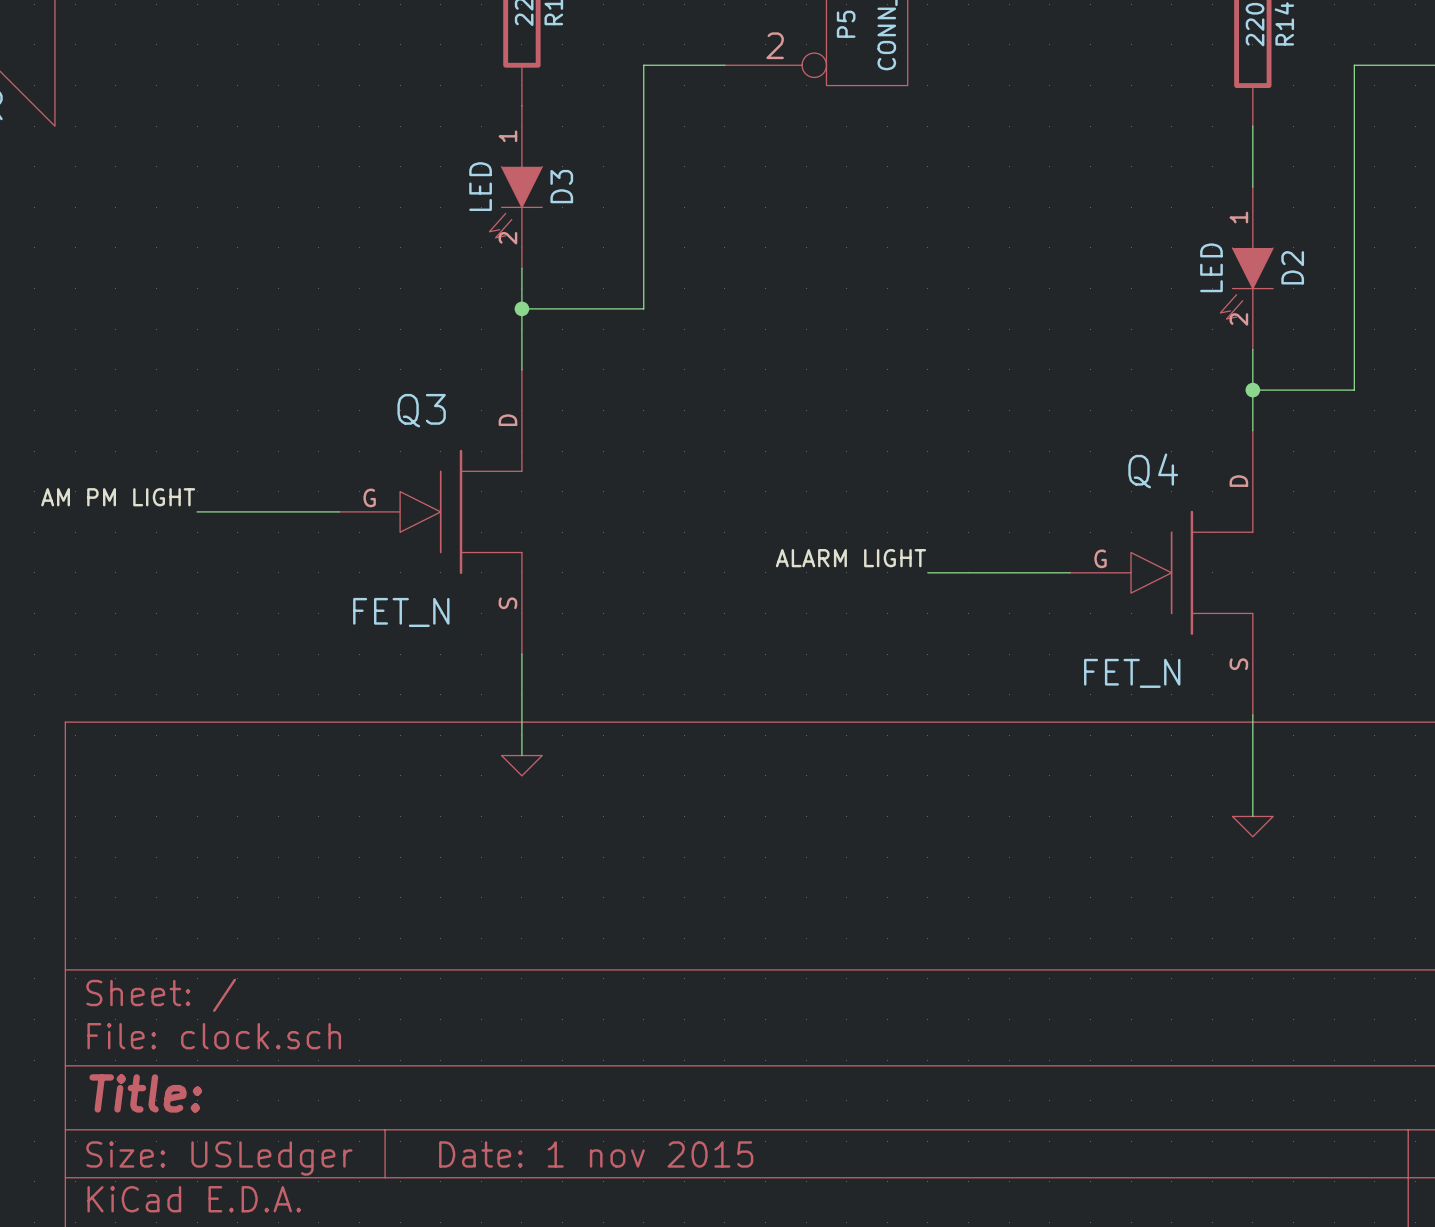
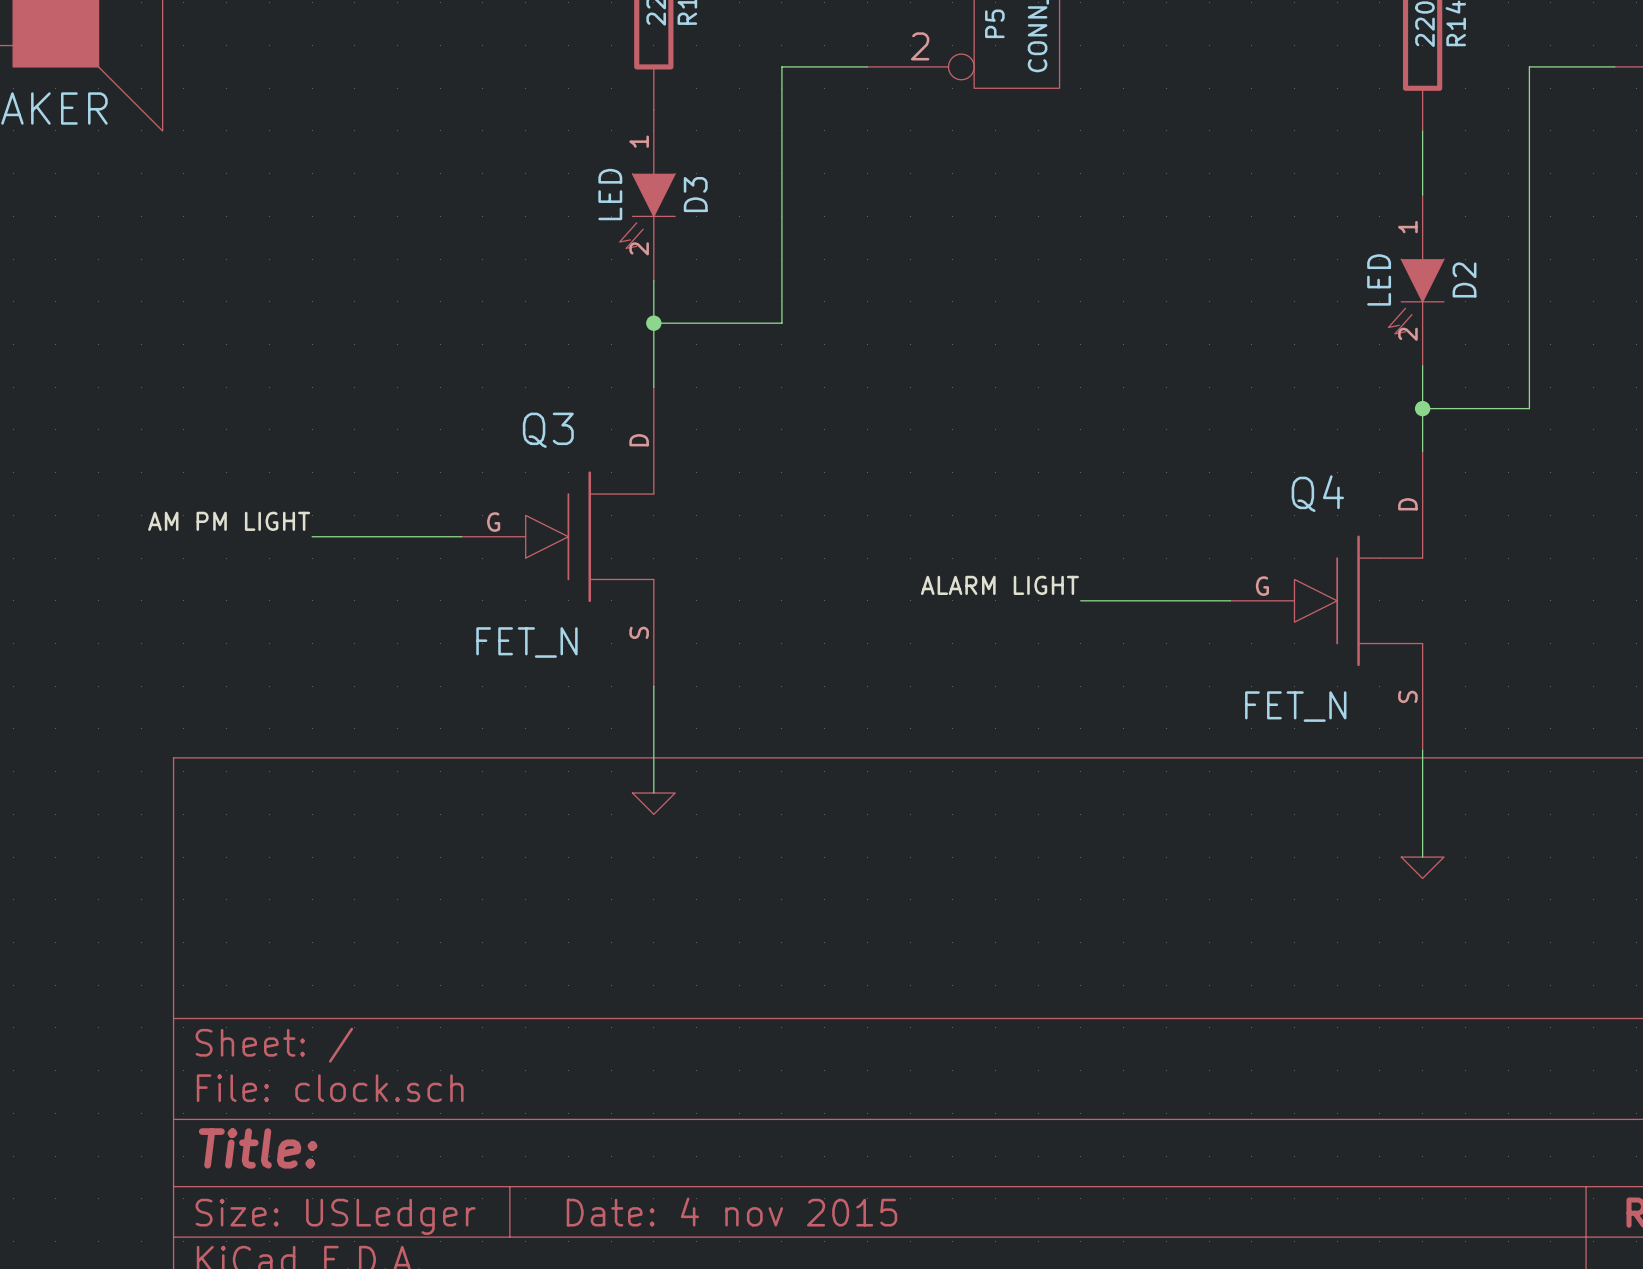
title block: Date: 1 nov 2015 (596, 1154) -> Date: 4 nov 2015 (731, 1212)

